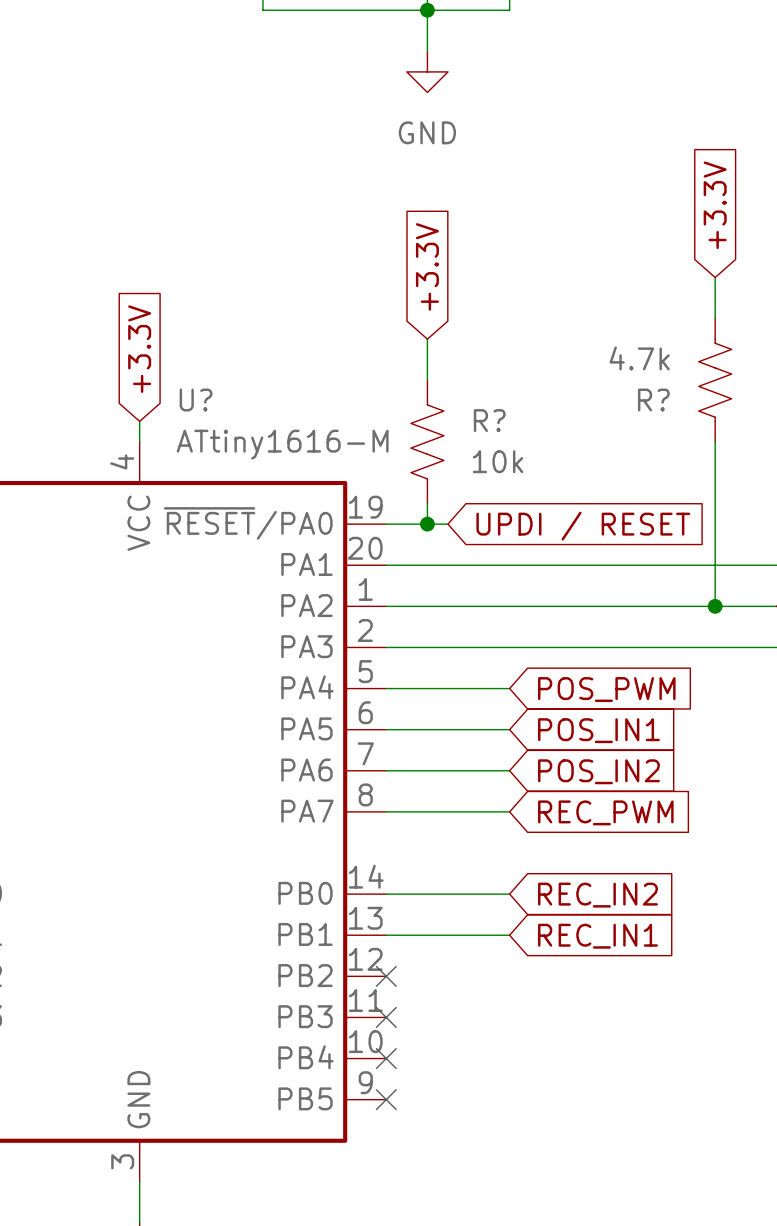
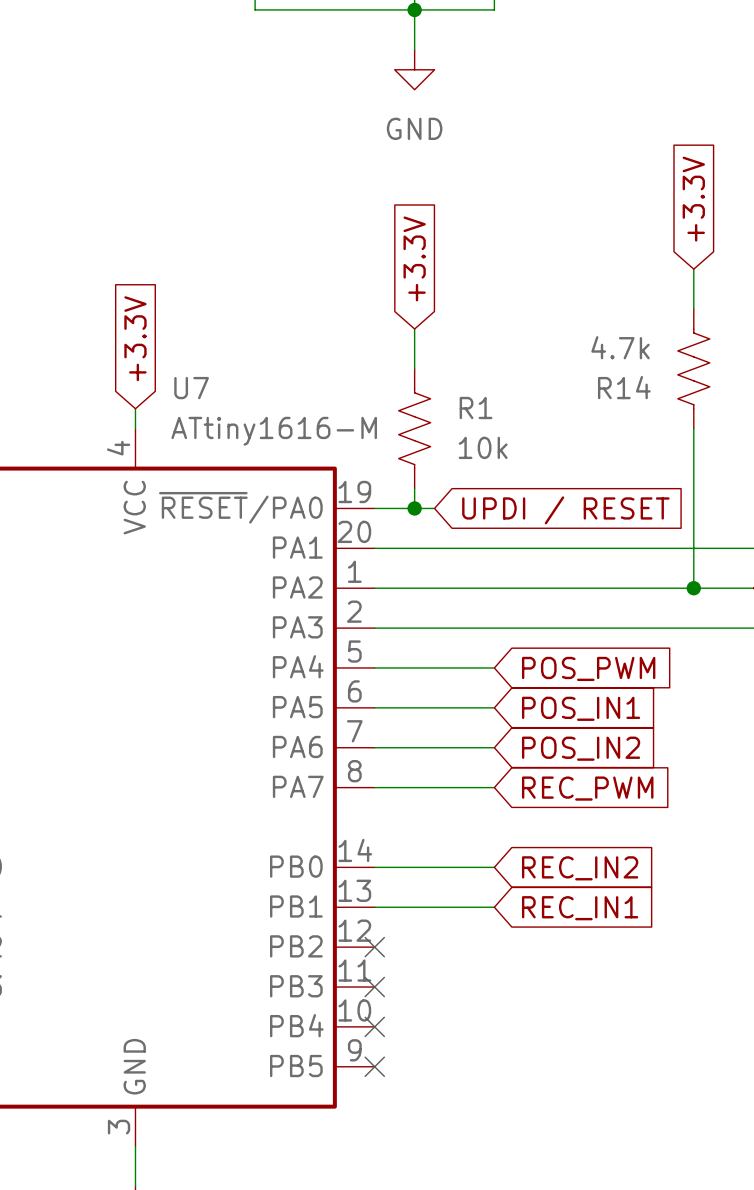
U? name: U? (196, 400) -> U7 (191, 388)
R? name: R? (653, 400) -> R14 (624, 387)
R? name: R? (489, 420) -> R1 (476, 408)

